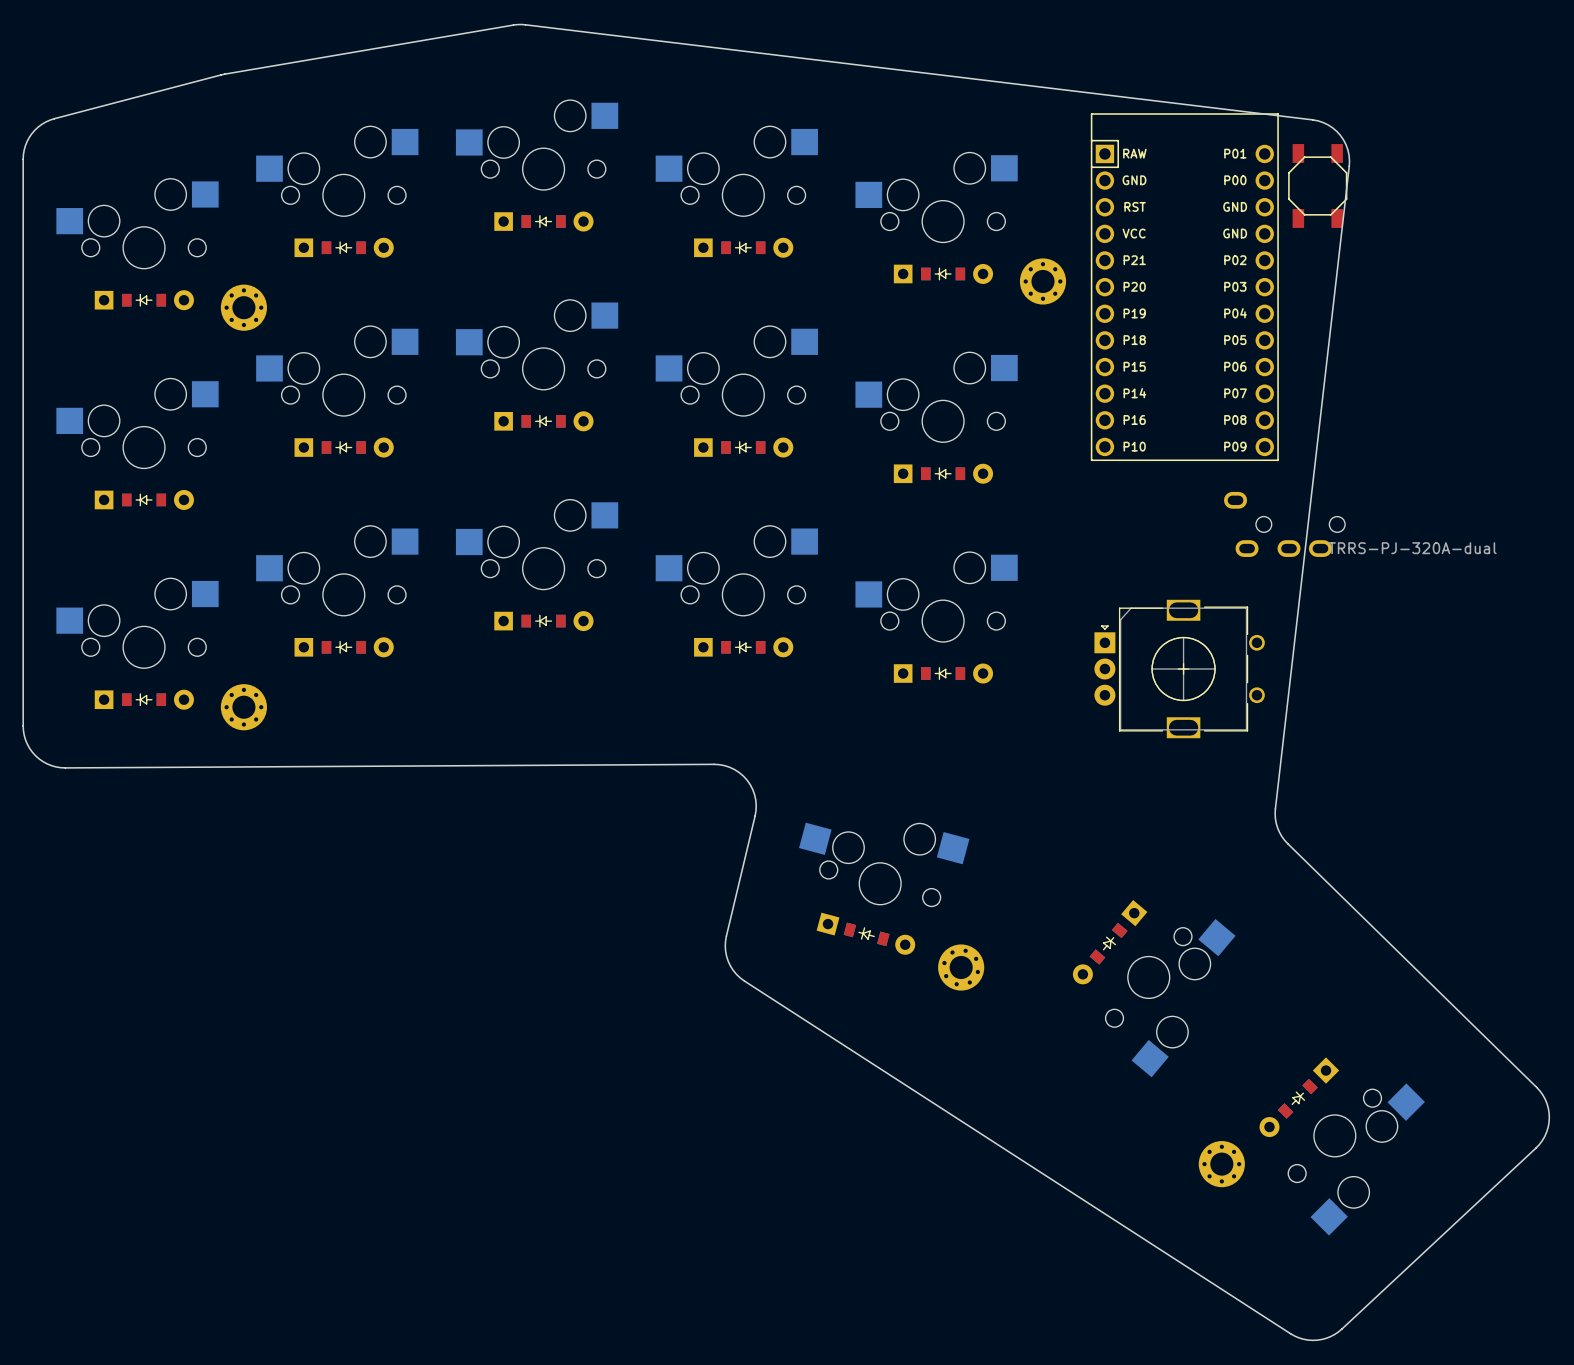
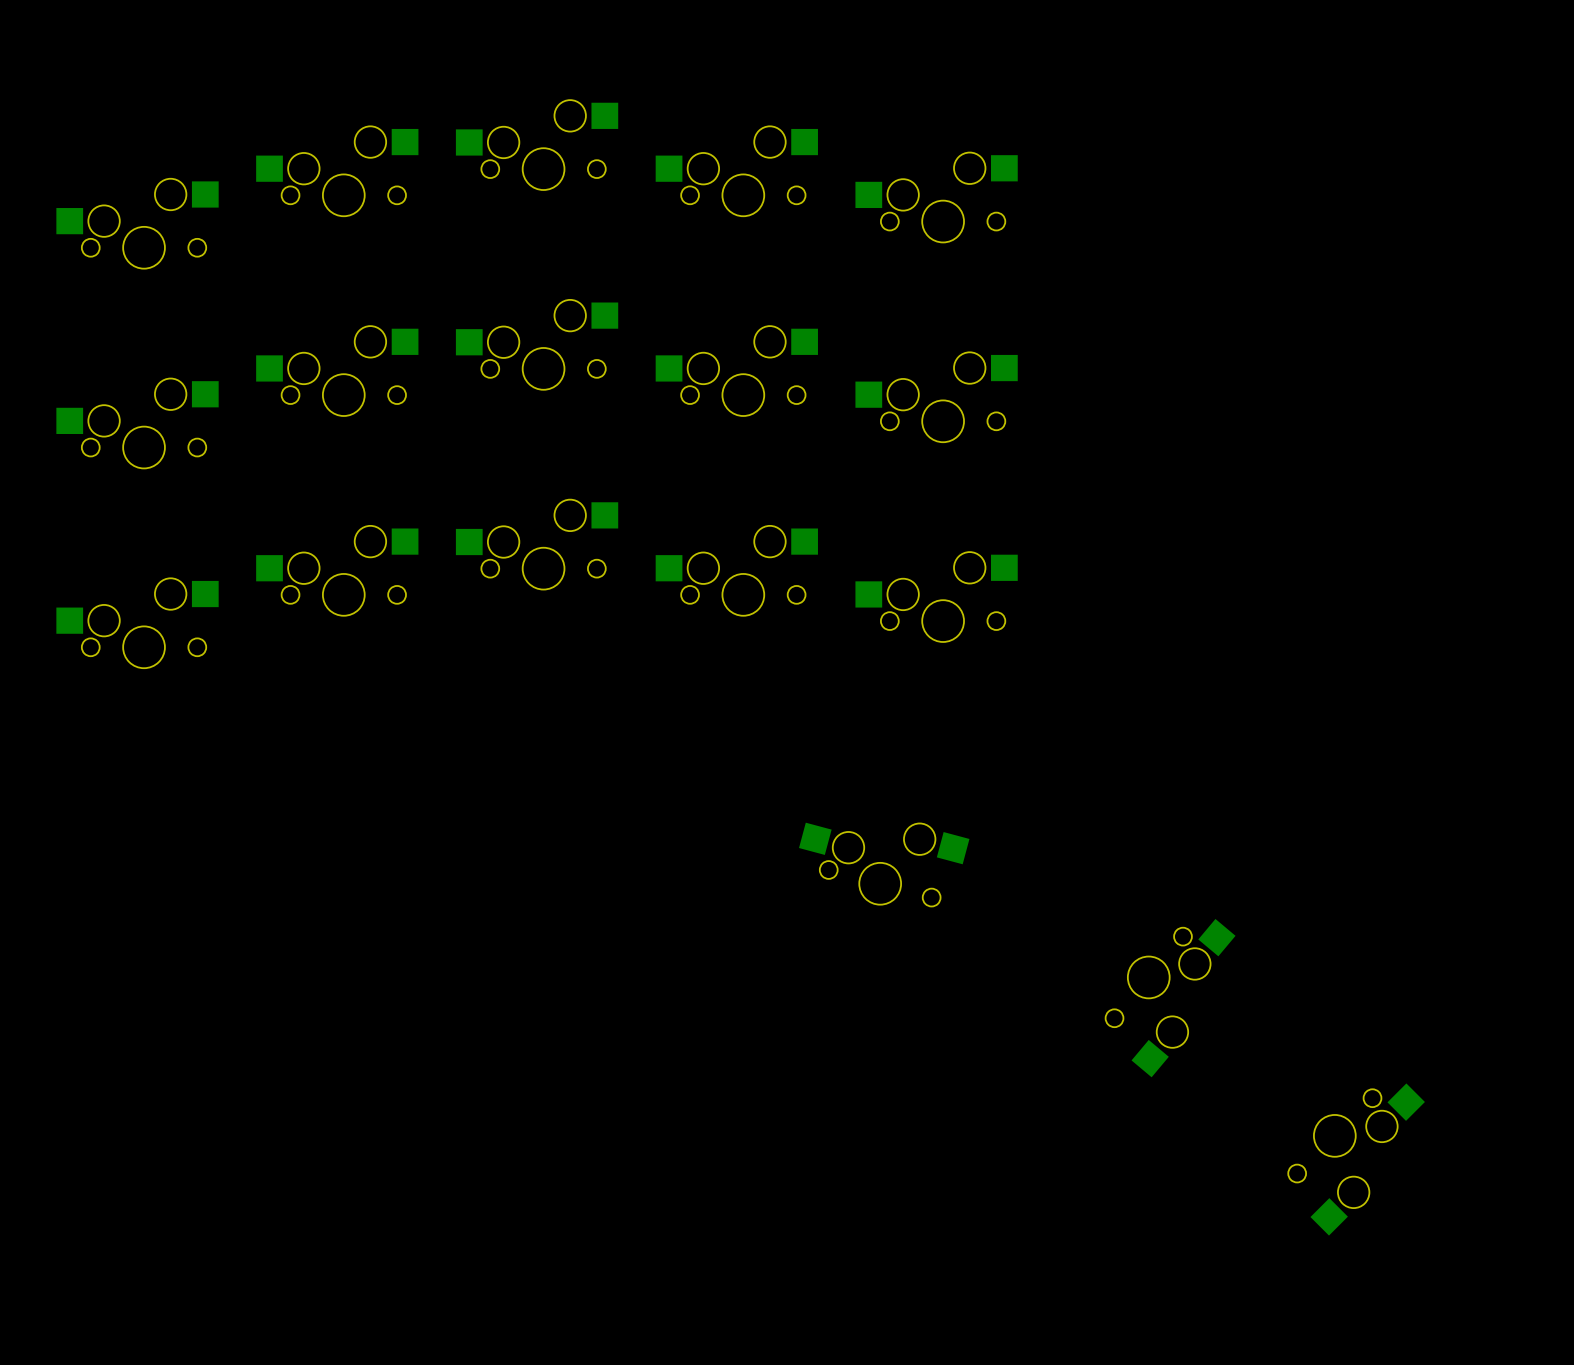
board edge: (525, 24) (1312, 119) (1328, 124) (1343, 140) (1347, 150) (1349, 166) (1275, 808) (1276, 823) (1279, 832) (1287, 843) (1536, 1087) (1547, 1103) (1549, 1117) (1546, 1132) (1536, 1148) (1334, 1334) (1321, 1339) (1312, 1340) (1298, 1337) (1290, 1333) (740, 977) (728, 961) (725, 941) (756, 805) (754, 794) (747, 780) (729, 767) (714, 764) (65, 767) (47, 763) (35, 755) (29, 748) (25, 739) (23, 725) (23, 159) (29, 137) (38, 127) (50, 120) (222, 74) (513, 25) (525, 24) -> none
part: (1317, 185) -> none
part: (543, 221) -> none
part: (344, 247) -> none
part: (743, 247) -> none
part: (943, 273) -> none
part: (1042, 281) -> none
part: (1184, 287) -> none
part: (144, 300) -> none
part: (243, 307) -> none
part: (543, 421) -> none
part: (344, 447) -> none
part: (743, 447) -> none
part: (943, 473) -> none
part: (144, 499) -> none
part: TRRS-PJ-320A-dual (1284, 524) -> none
part: (543, 621) -> none
part: (344, 647) -> none
part: (743, 647) -> none
part: (1179, 669) -> none
part: (943, 673) -> none
part: (144, 699) -> none
part: (243, 707) -> none
part: (865, 933) -> none
part: (1110, 942) -> none
part: (961, 967) -> none
part: (1299, 1097) -> none
part: (1221, 1164) -> none

